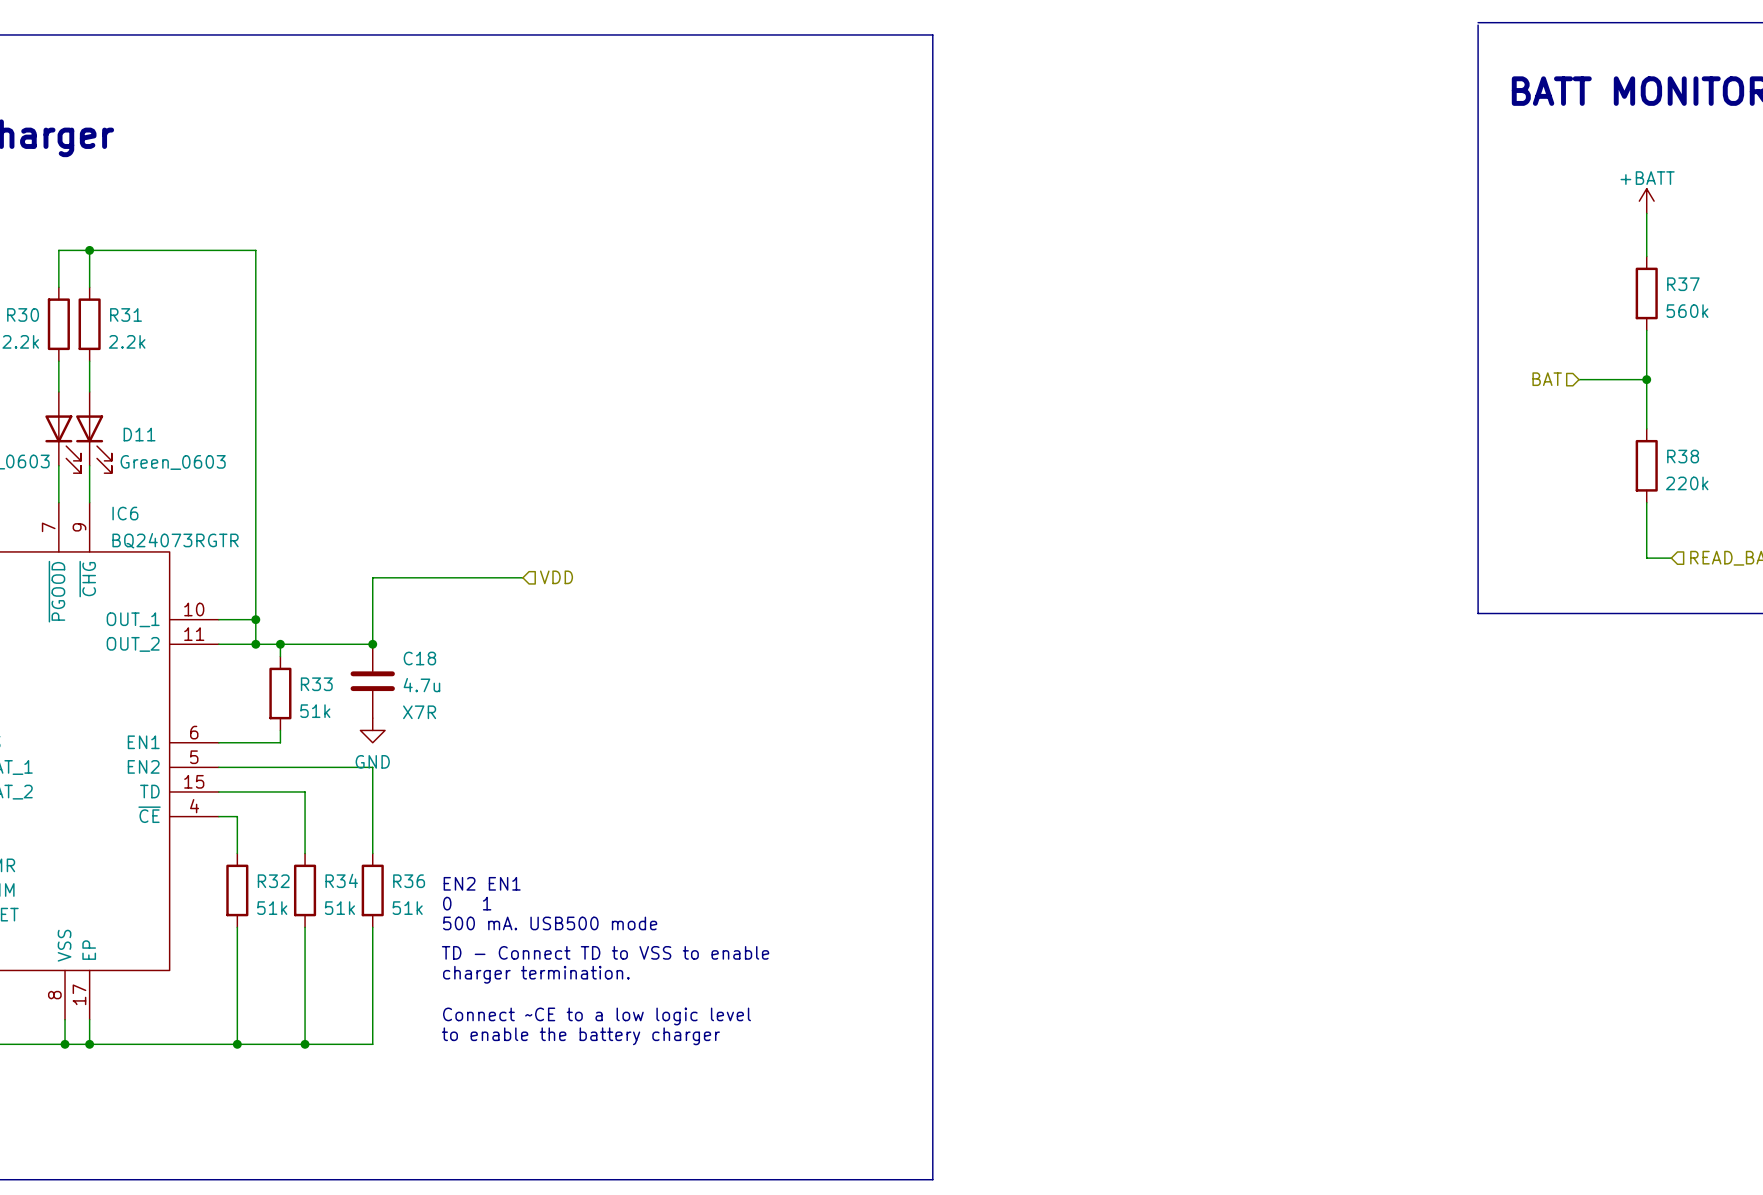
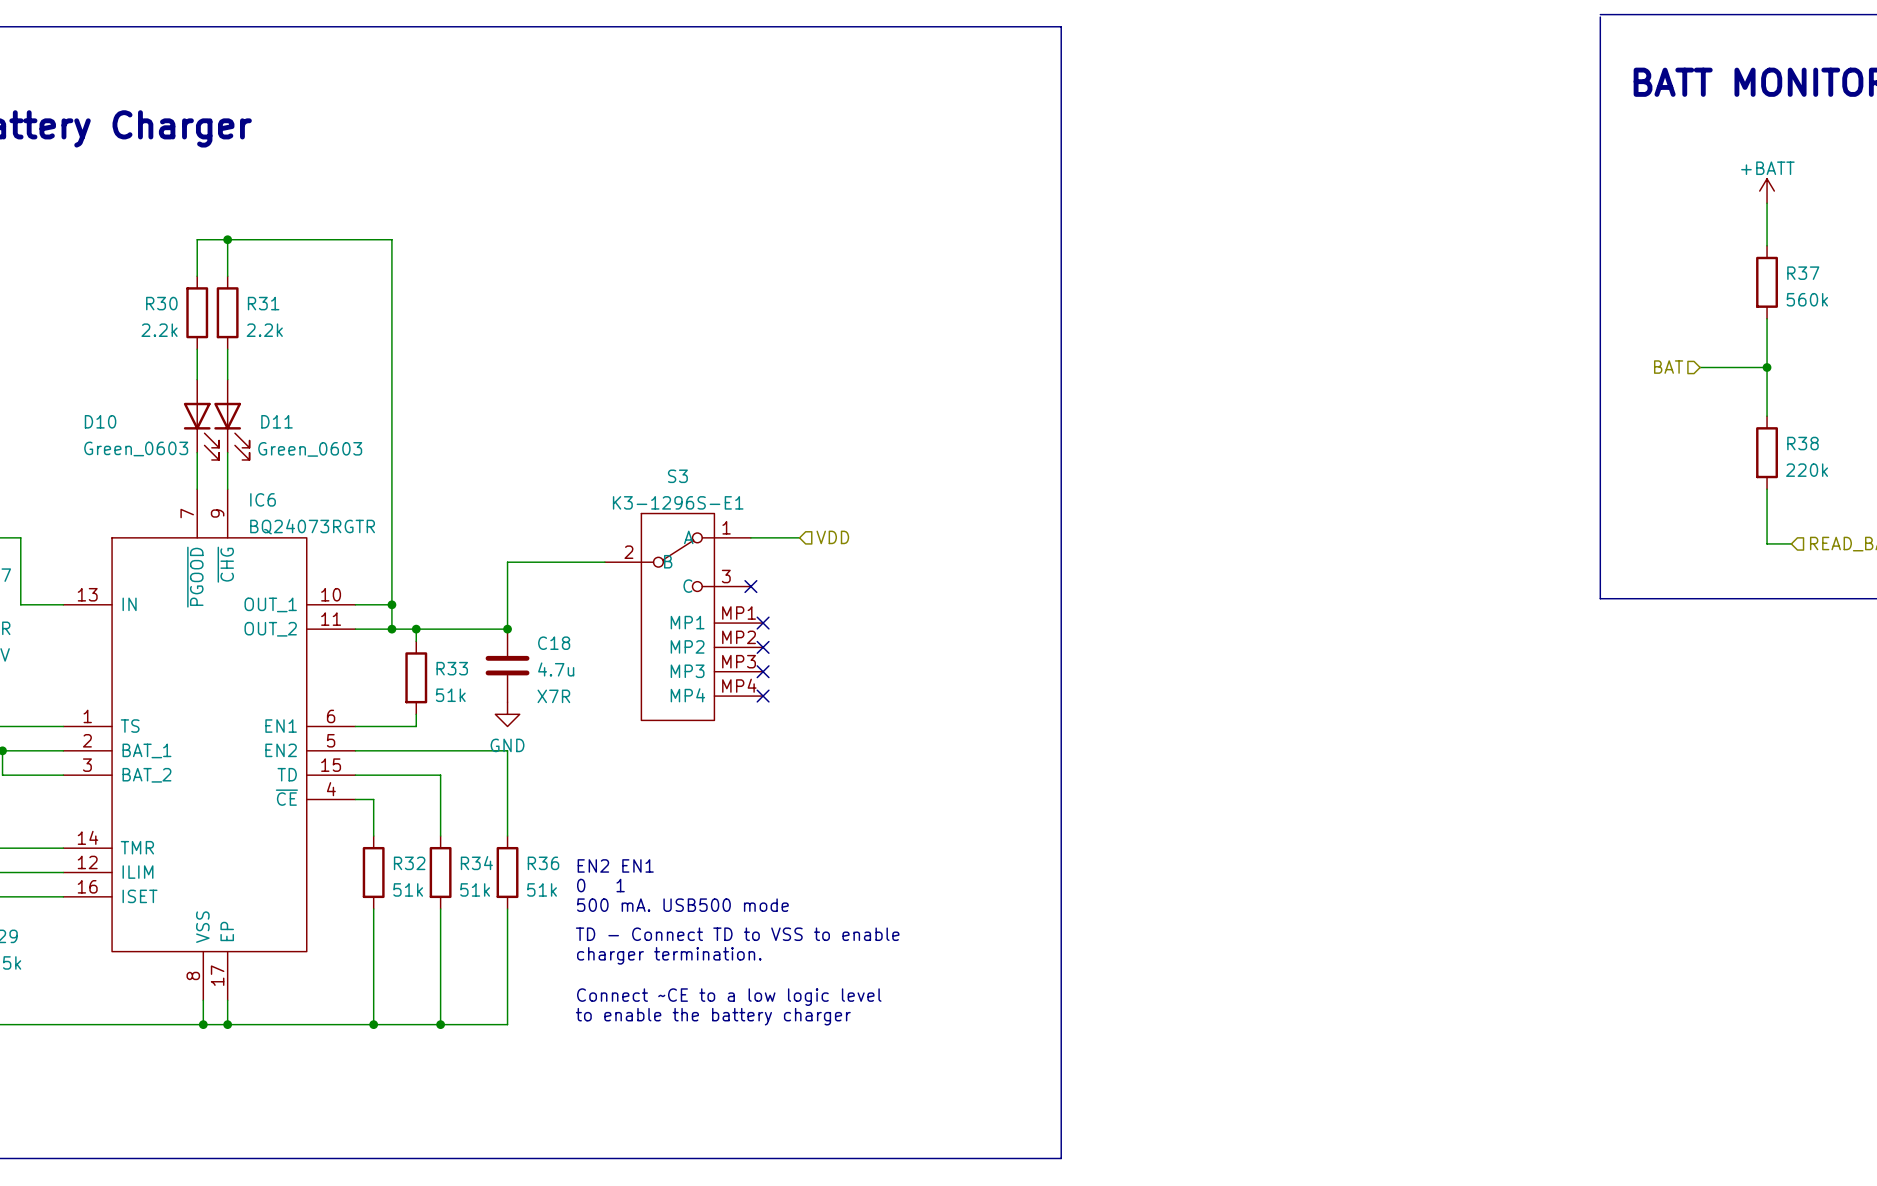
wire: none -> (750, 537) (799, 537)
wire: (372, 577) (522, 577) -> (507, 563) (604, 562)
hierarchical label position: VDD (556, 577) -> VDD (832, 537)
no-connect mark: none -> (750, 586)
S3: none -> K3-1296S-E1 (683, 616)
no-connect mark: none -> (763, 623)
no-connect mark: none -> (763, 647)
no-connect mark: none -> (763, 671)
no-connect mark: none -> (763, 696)

